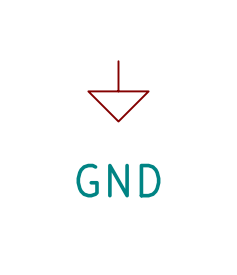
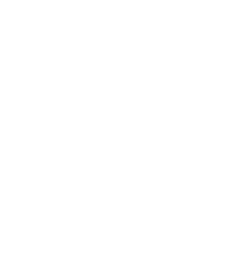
power symbol: GND (118, 91) -> none

